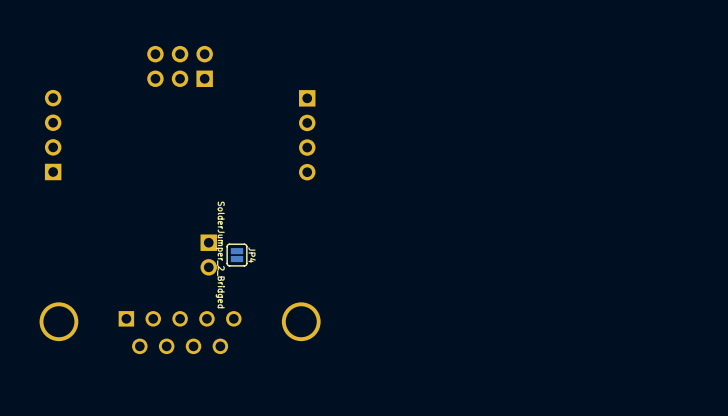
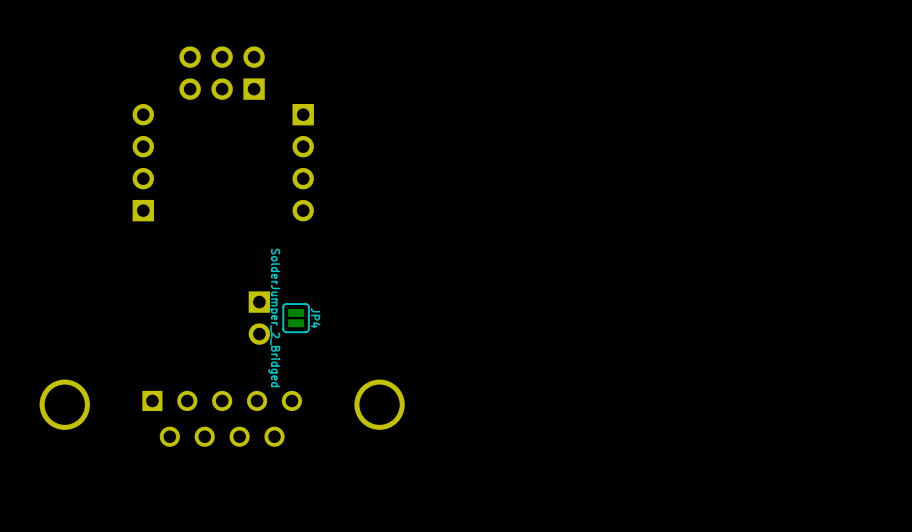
part position: (53, 135) -> (143, 162)
part position: (307, 135) -> (303, 162)

